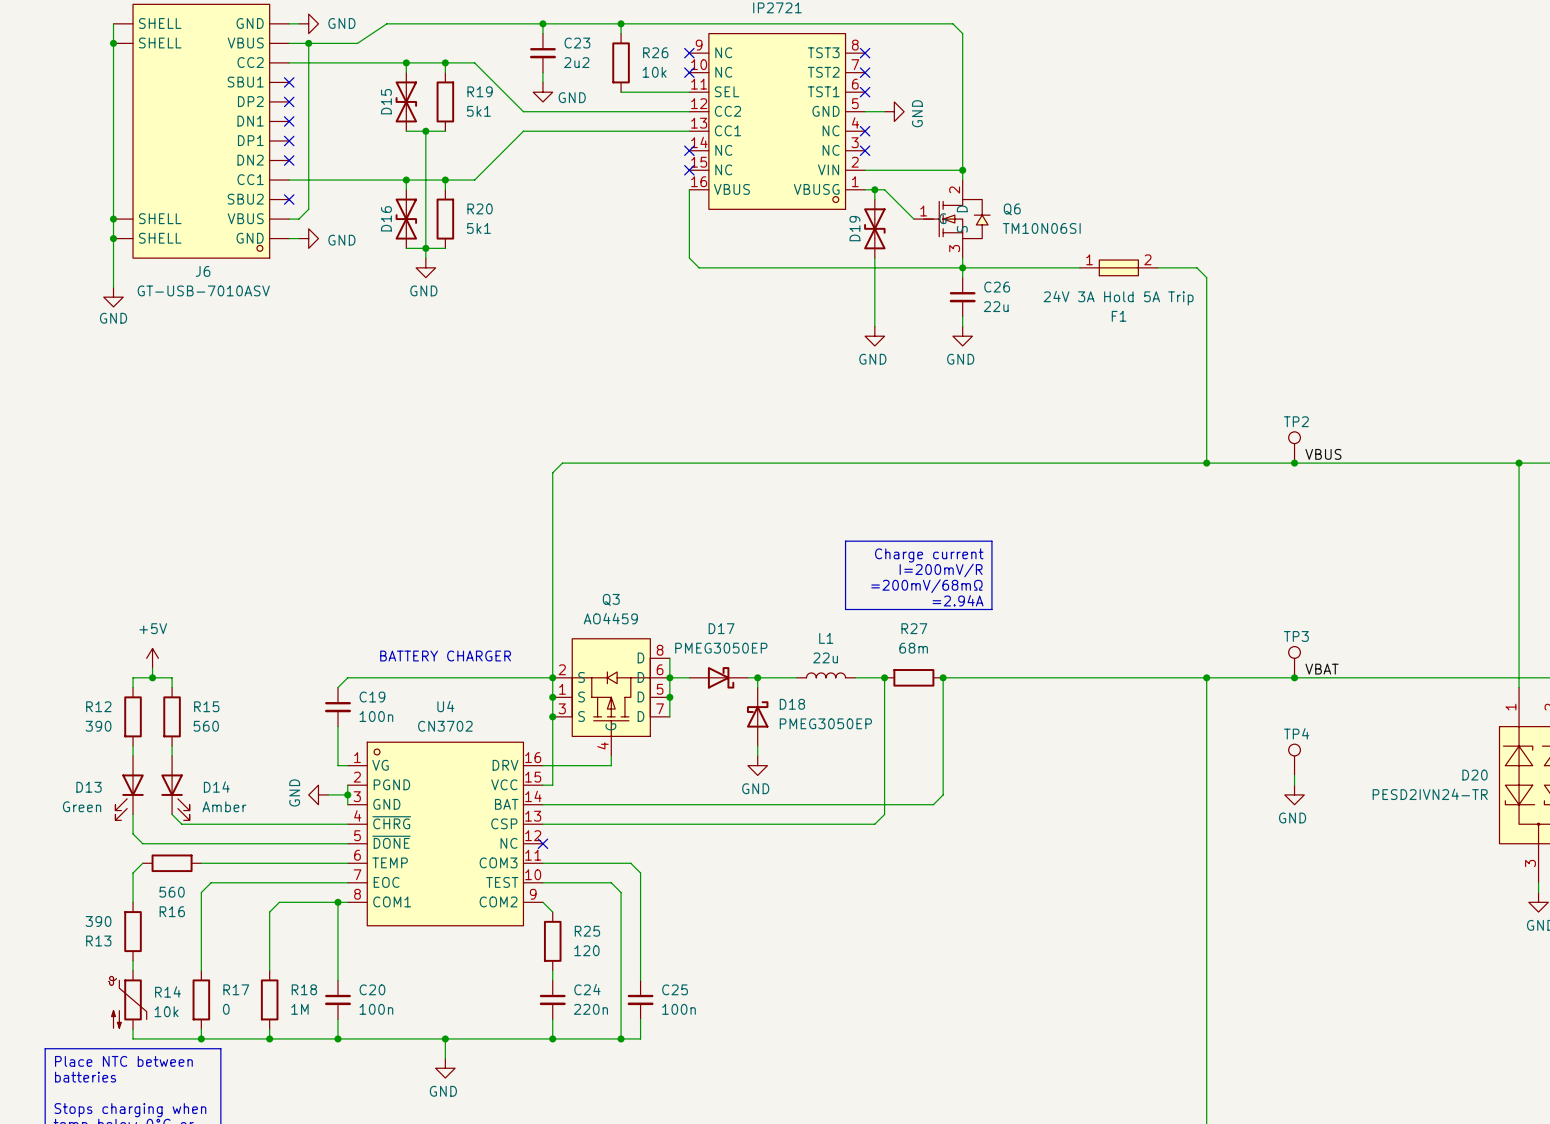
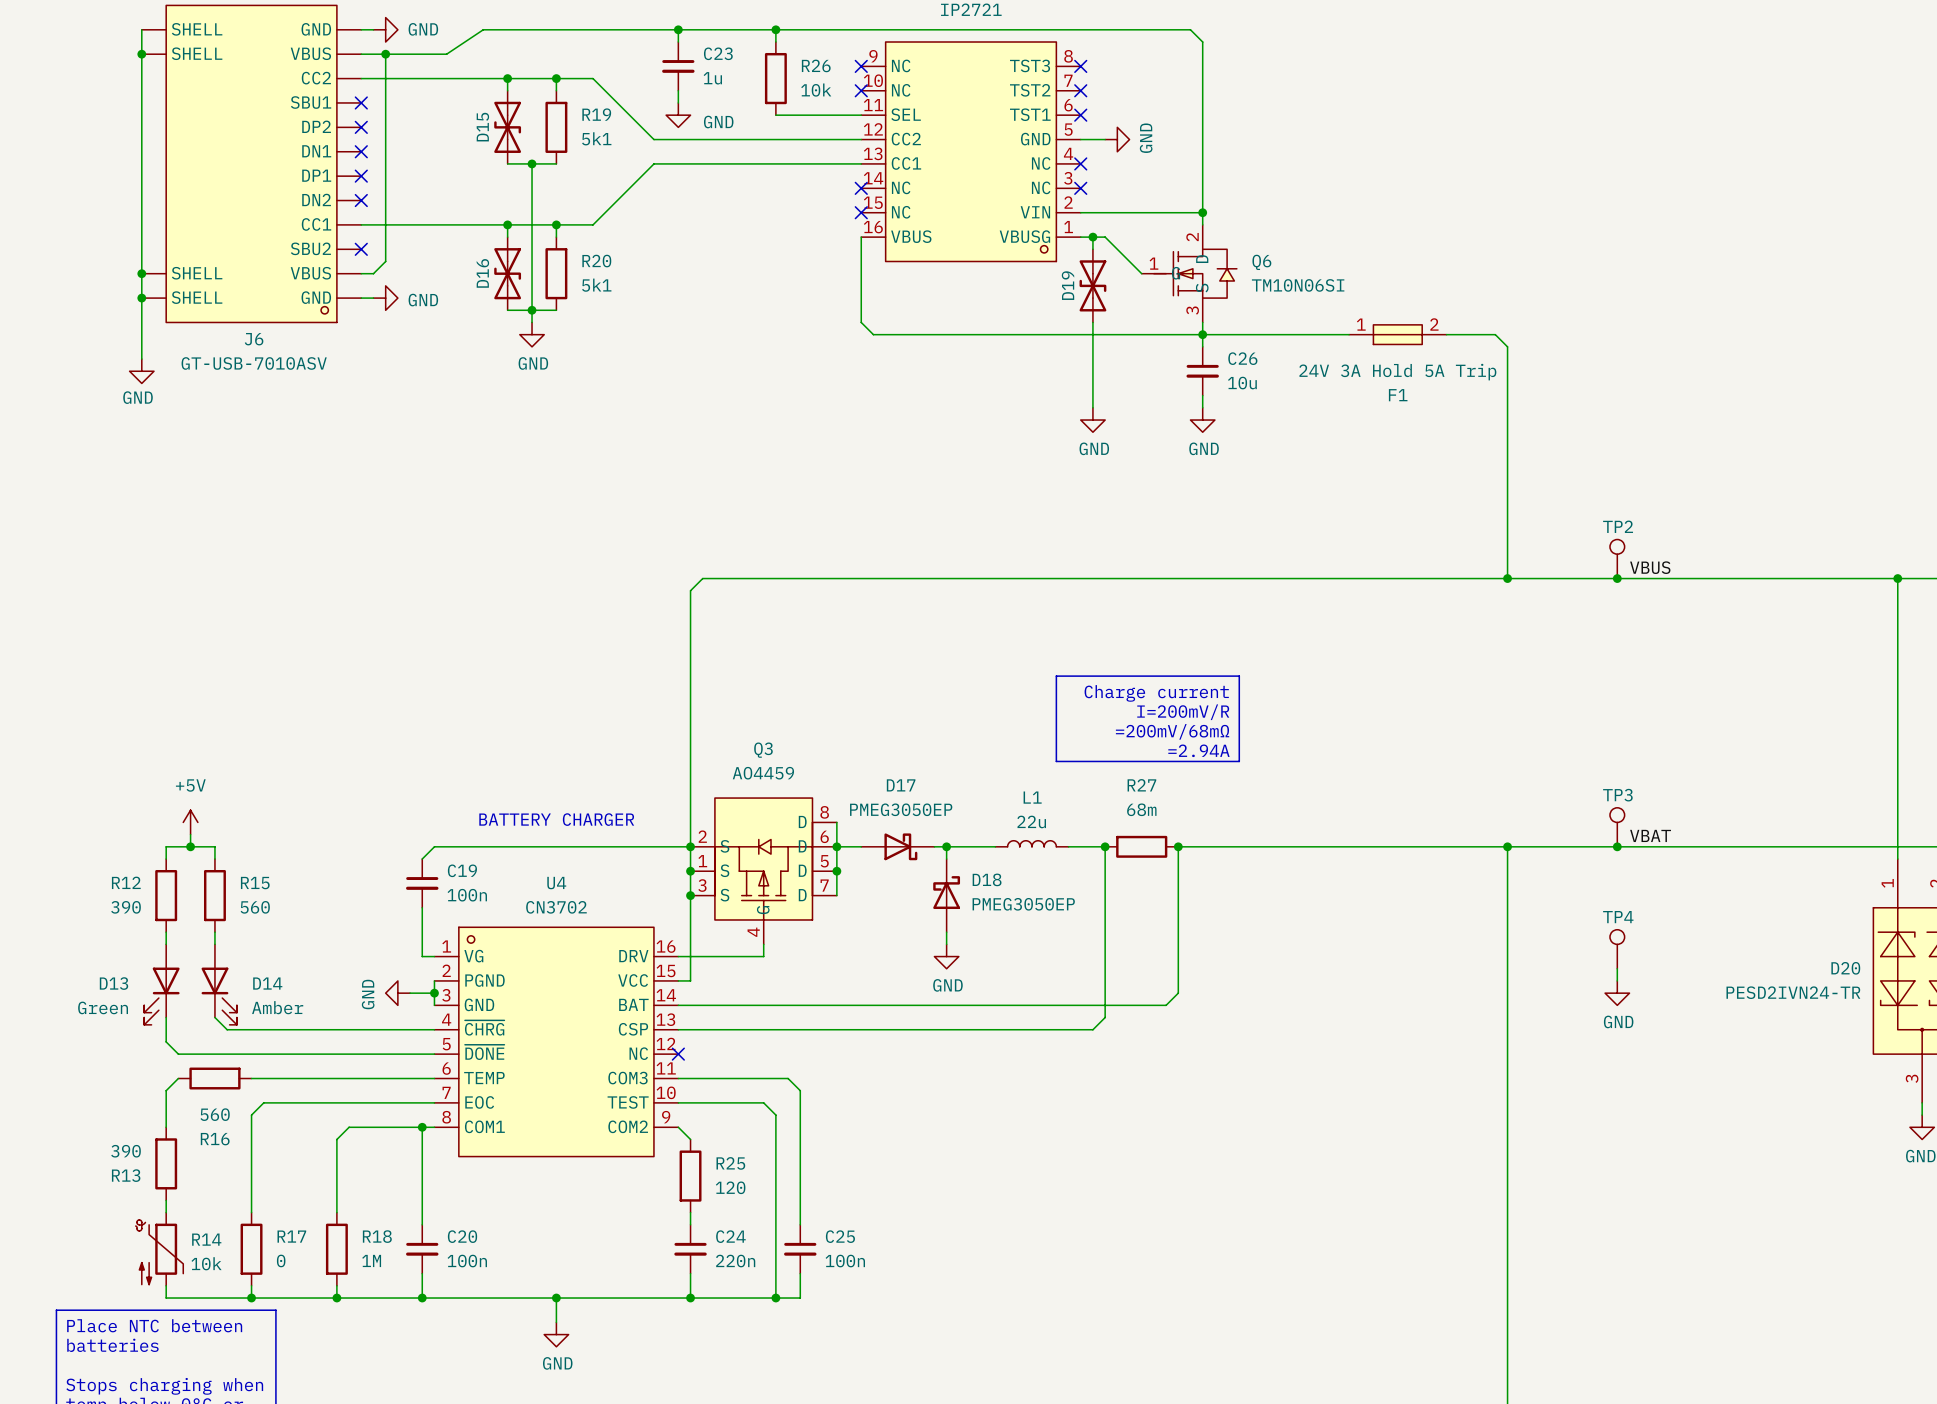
C23 value: 2u2 (576, 62) -> 1u (712, 78)
C26 value: 22u (996, 306) -> 10u (1242, 383)

